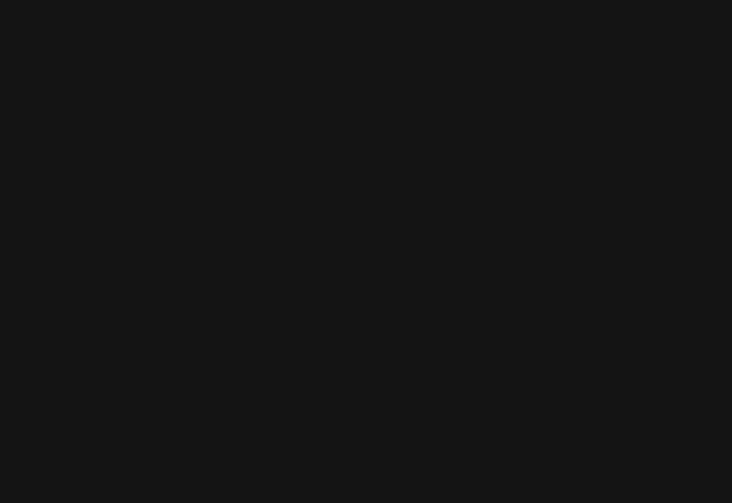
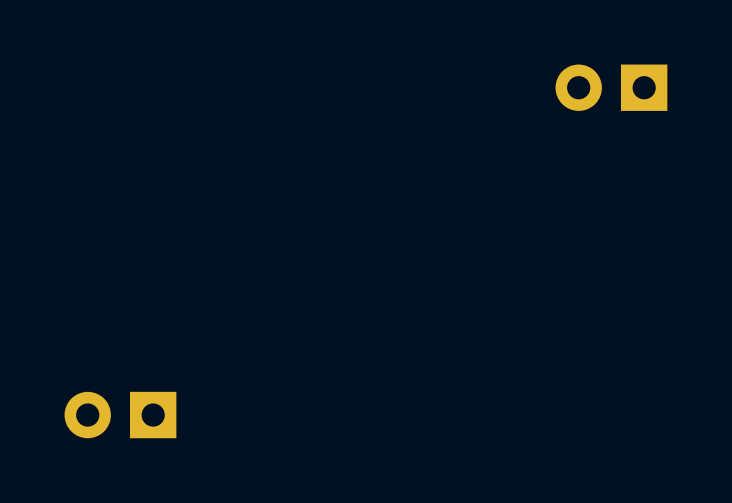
part: none -> (611, 87)
part: none -> (120, 415)

